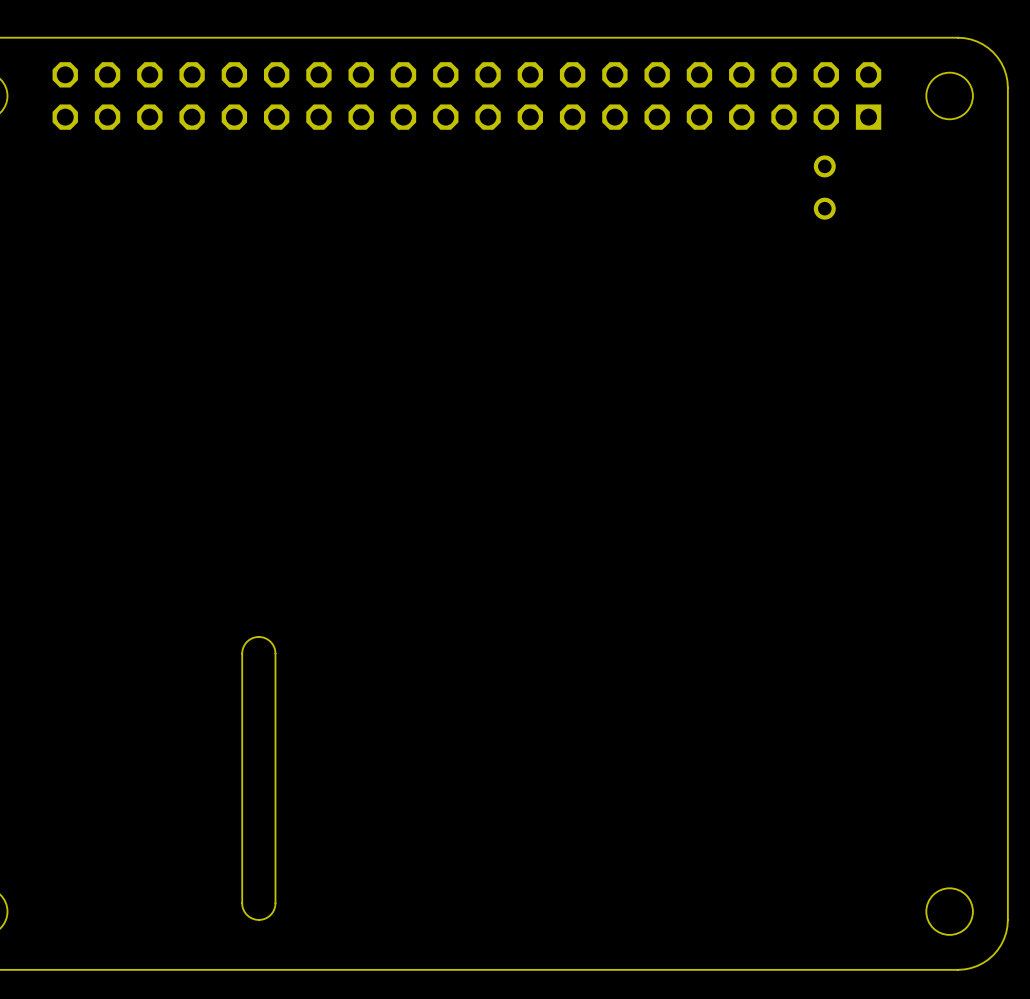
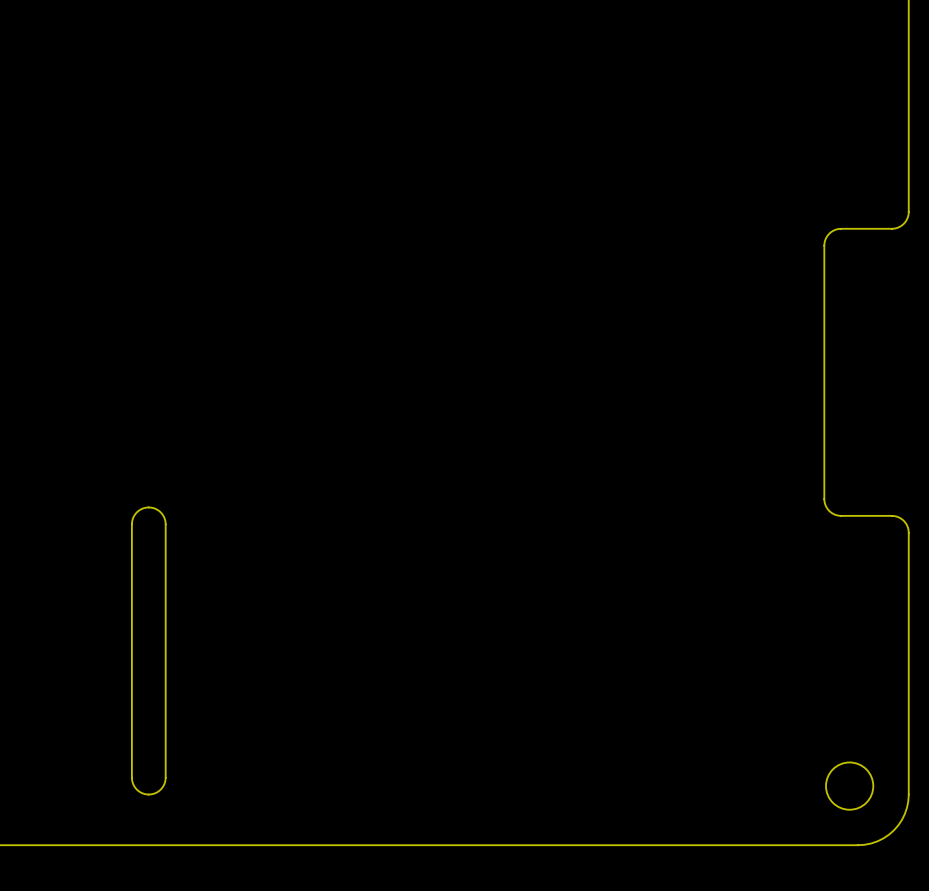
part: (824, 187) -> none
board edge: (1007, 345) (1007, 661) -> (908, 211) (905, 222) (898, 227) (836, 229) (827, 235) (824, 245) (824, 503) (830, 512) (839, 515) (898, 517) (905, 522) (908, 532)

